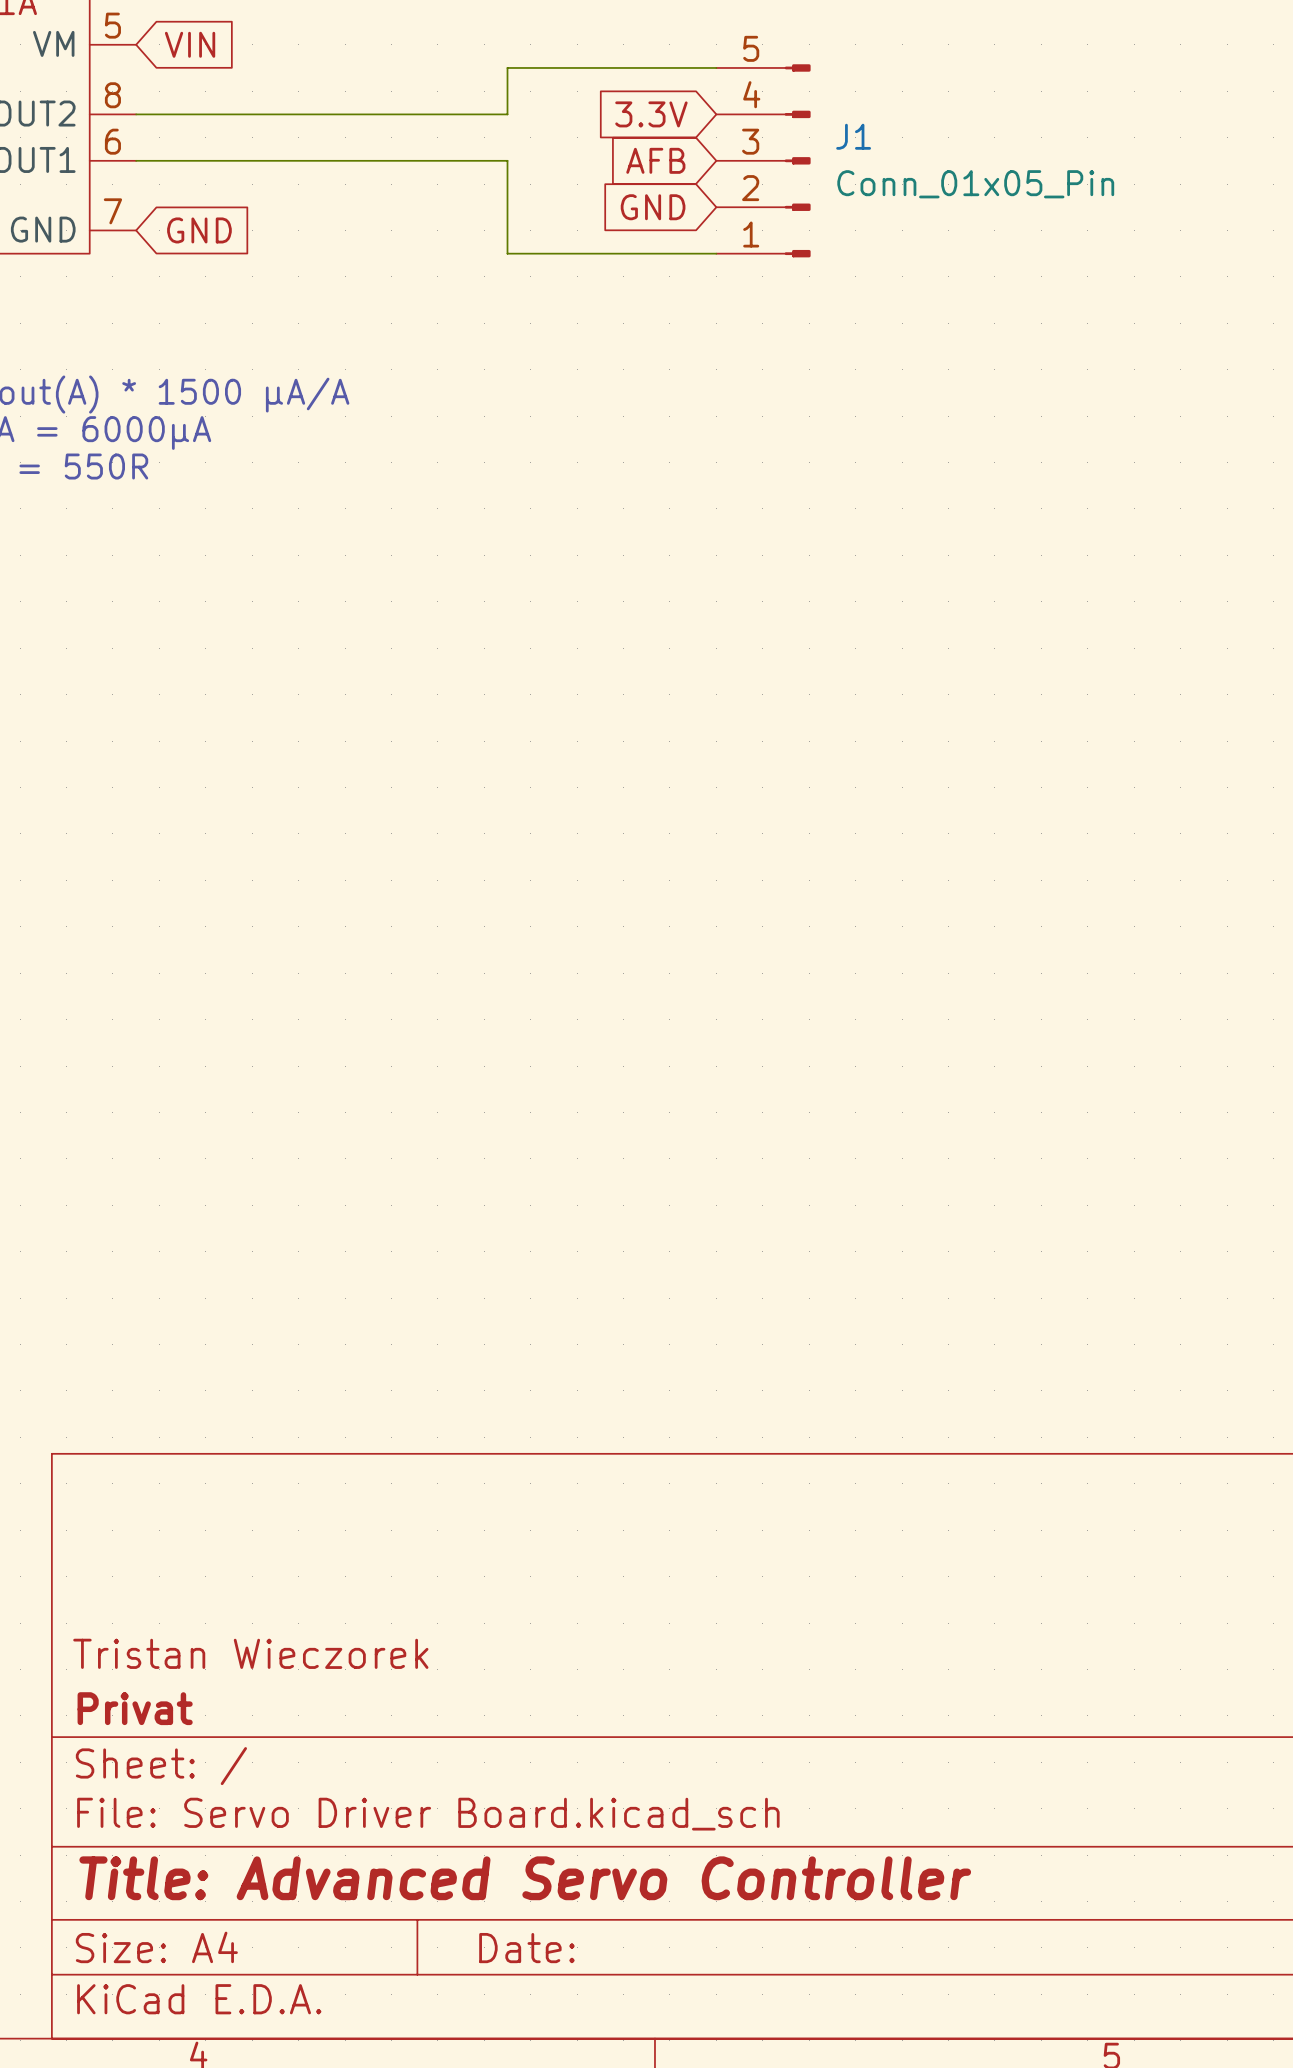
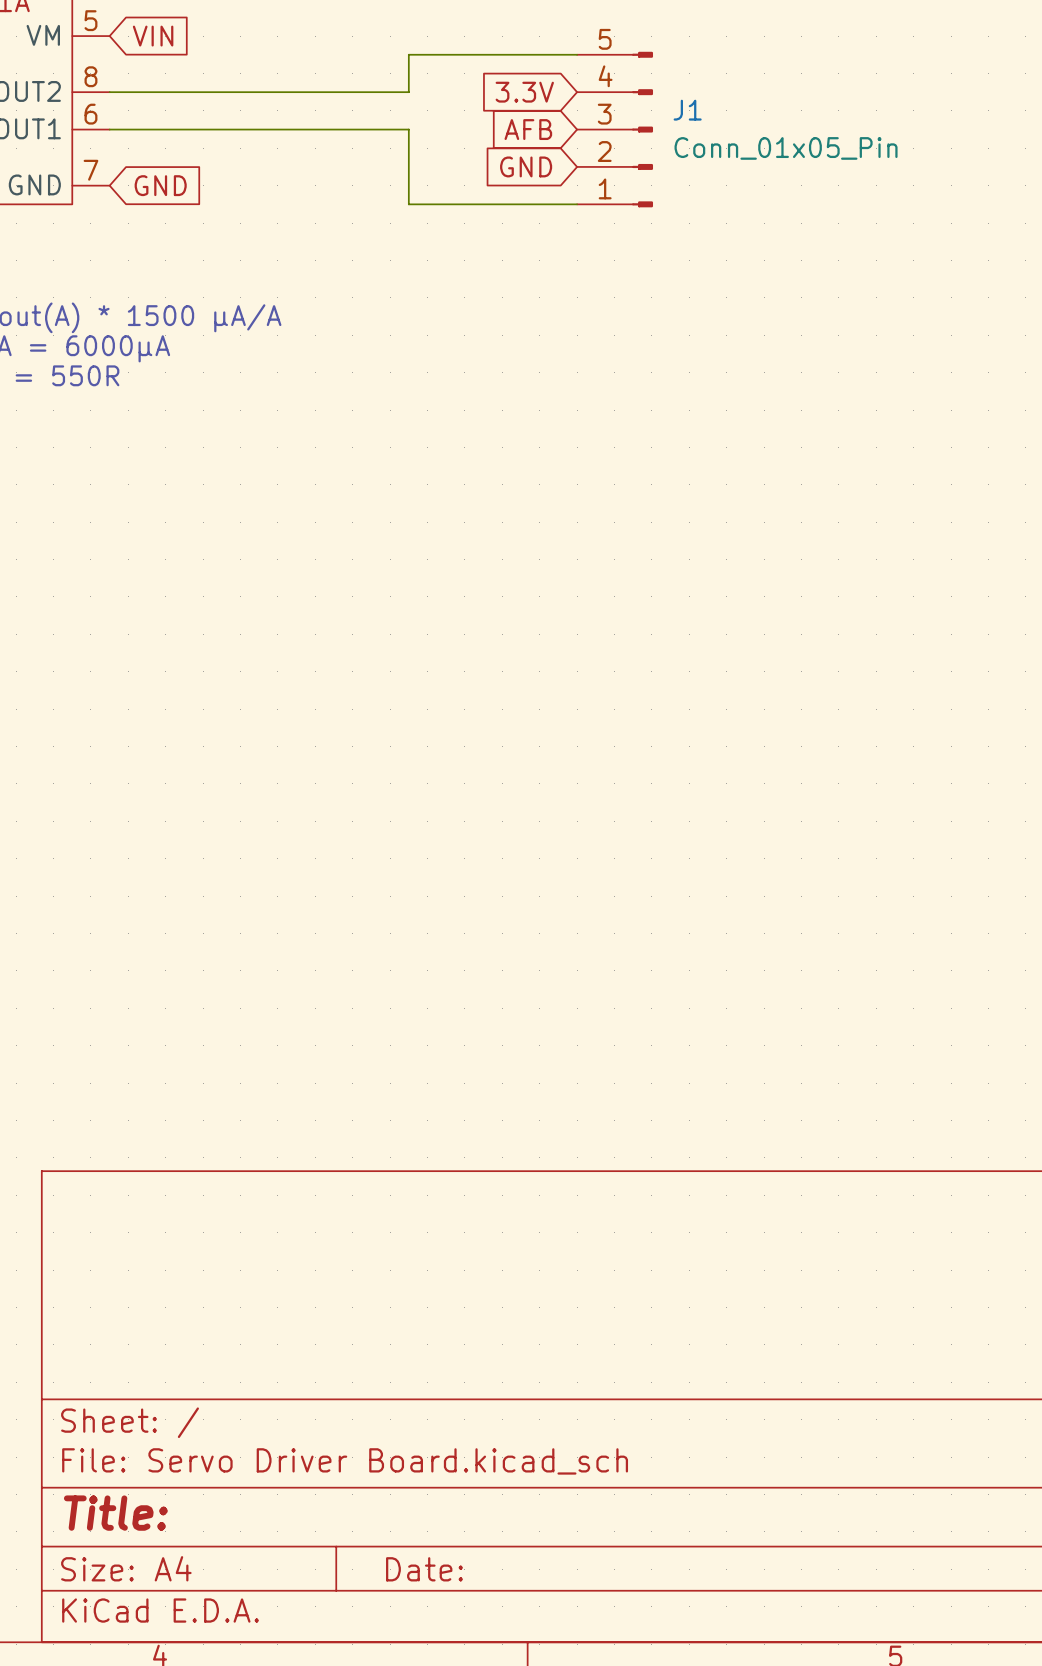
title block: Tristan Wieczorek (250, 1653) -> none
title block: Privat (135, 1708) -> none
title block: Title: Advanced Servo Controller (525, 1878) -> Title: (115, 1513)

